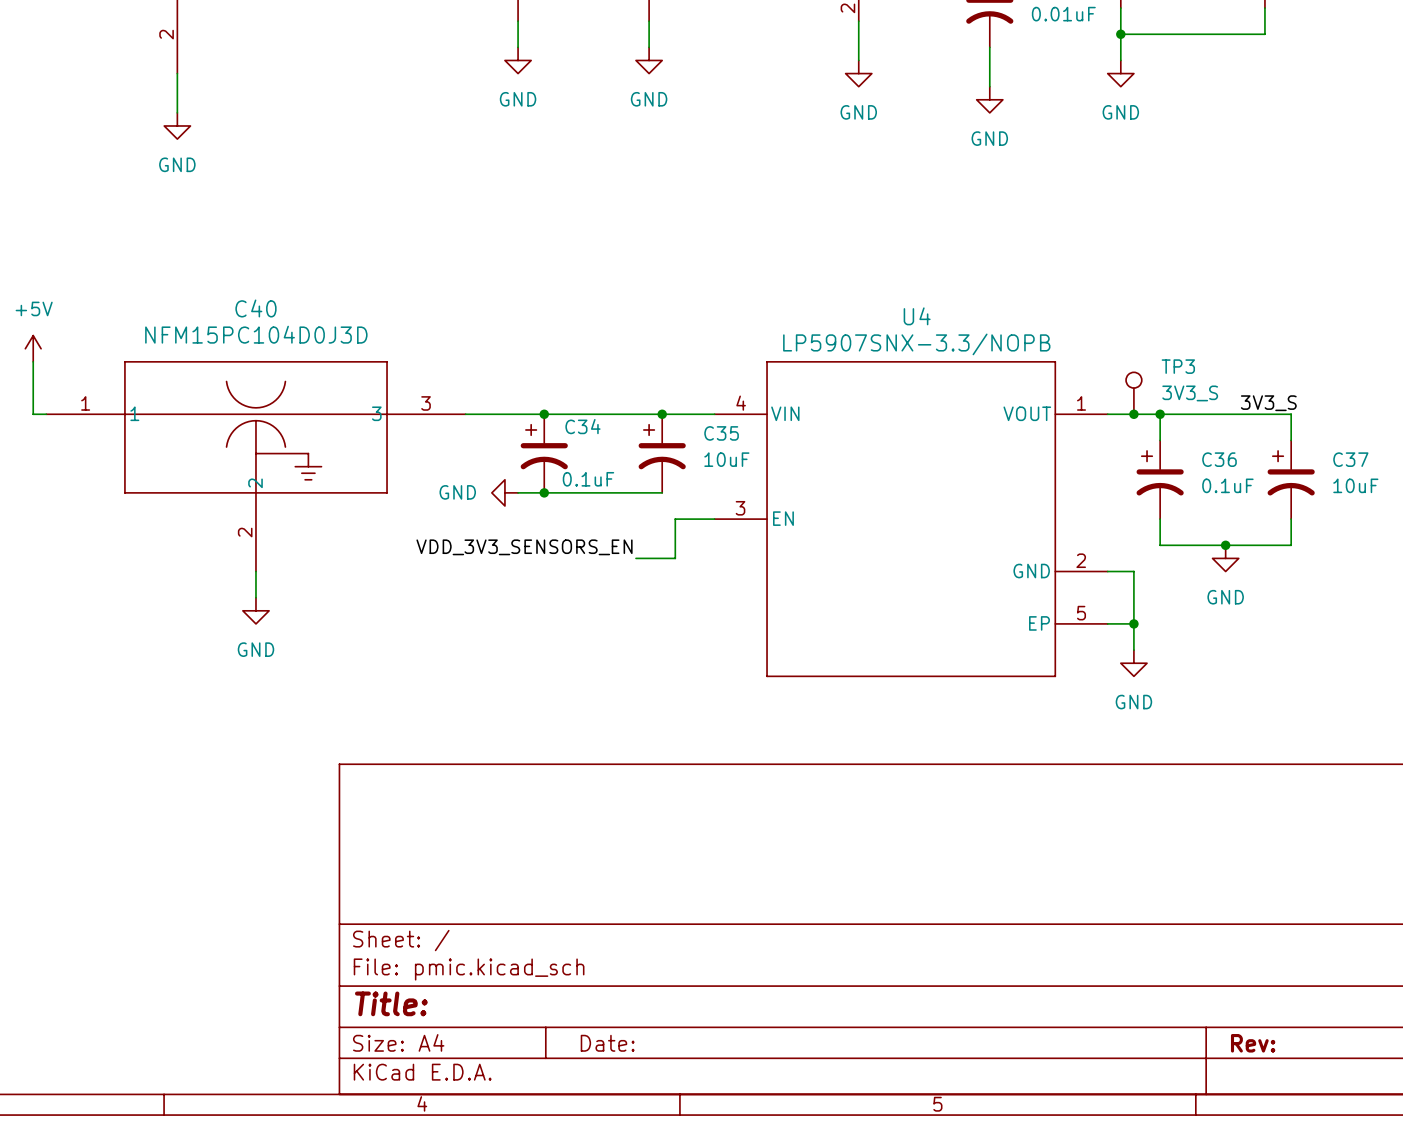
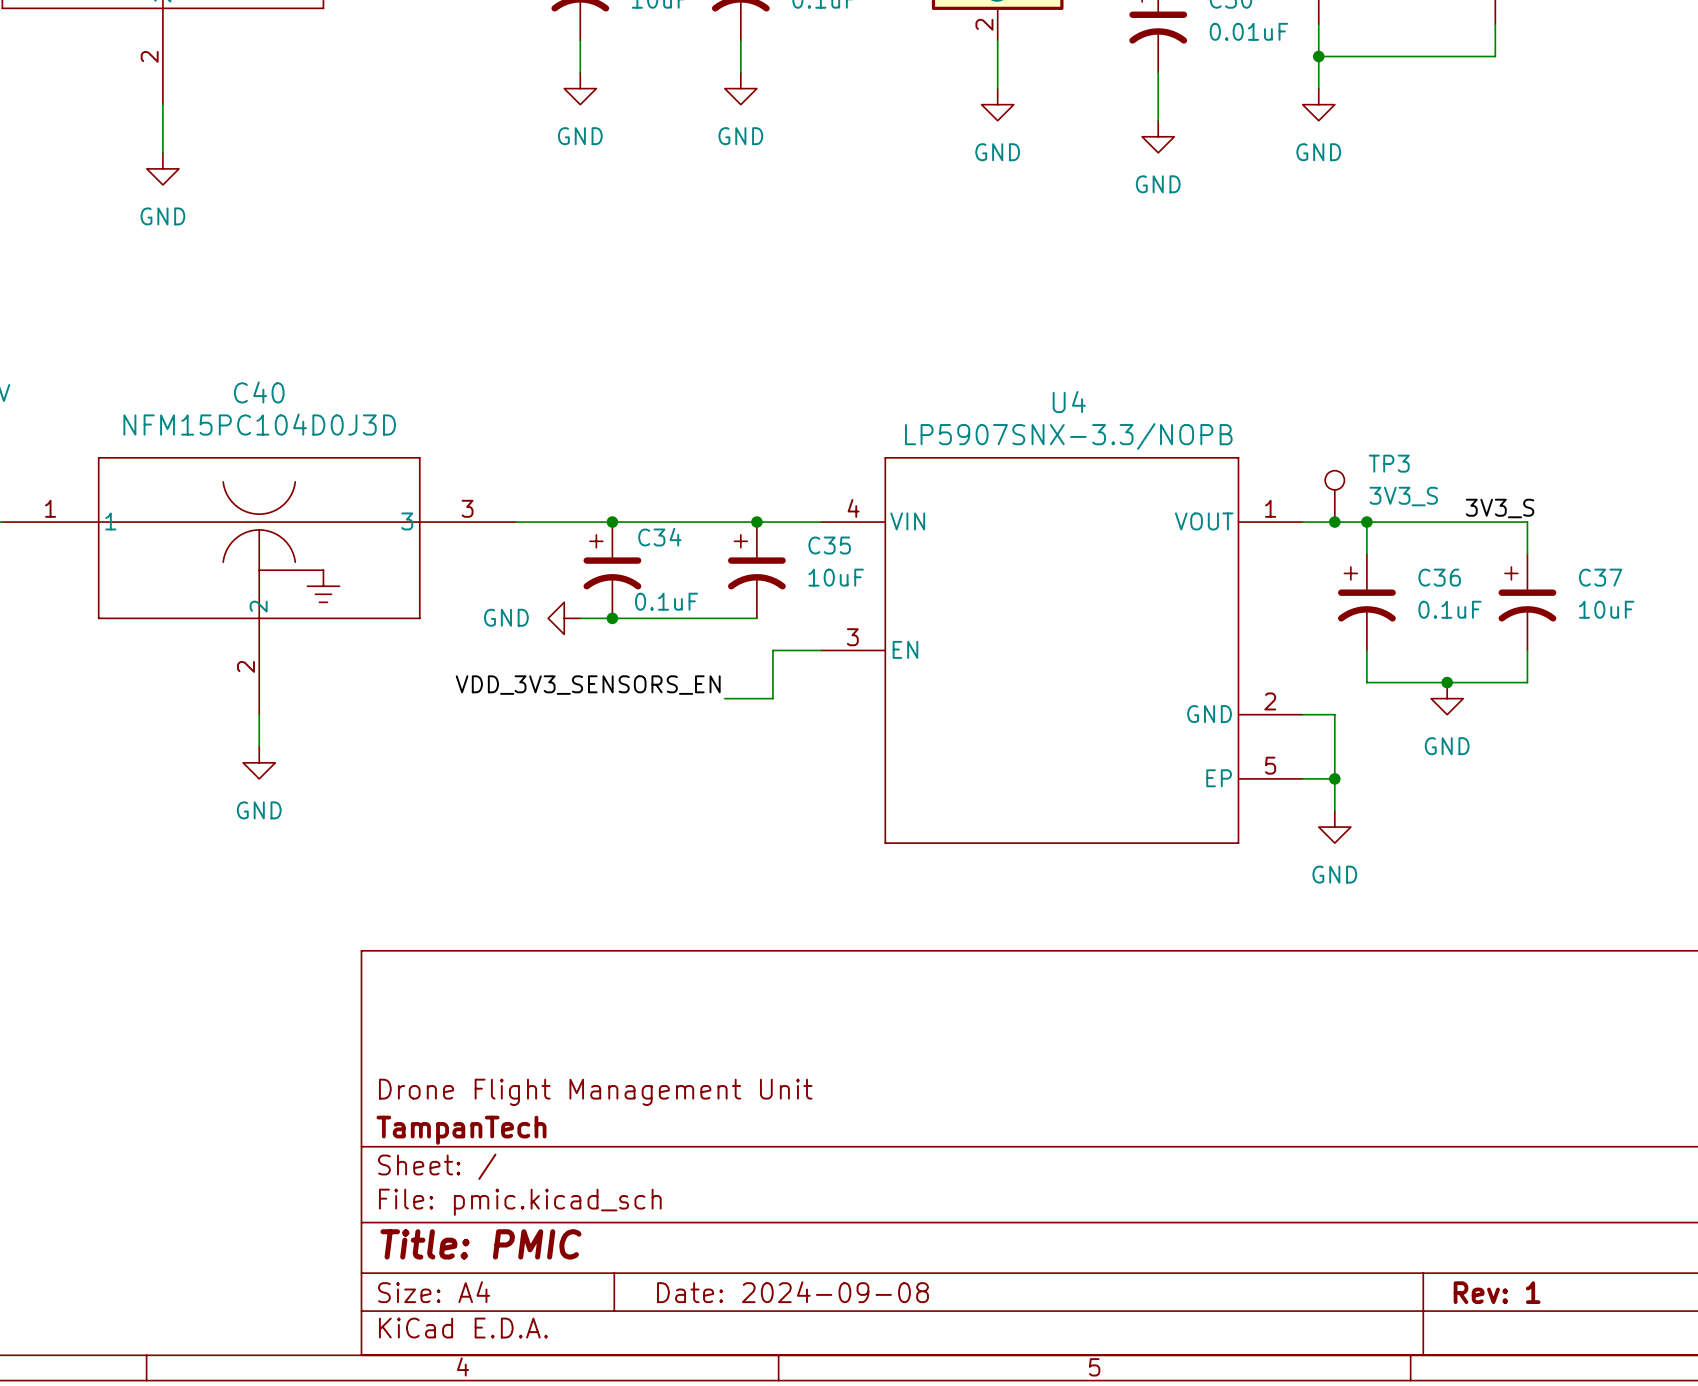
title block: none -> Drone Flight Management Unit (595, 1092)
title block: none -> TampanTech (461, 1130)
title block: Title: (391, 1003) -> Title: PMIC (480, 1244)
title block: Date: (607, 1043) -> Date: 2024-09-08 (792, 1292)
title block: Rev: (1253, 1043) -> Rev: 1 (1497, 1292)

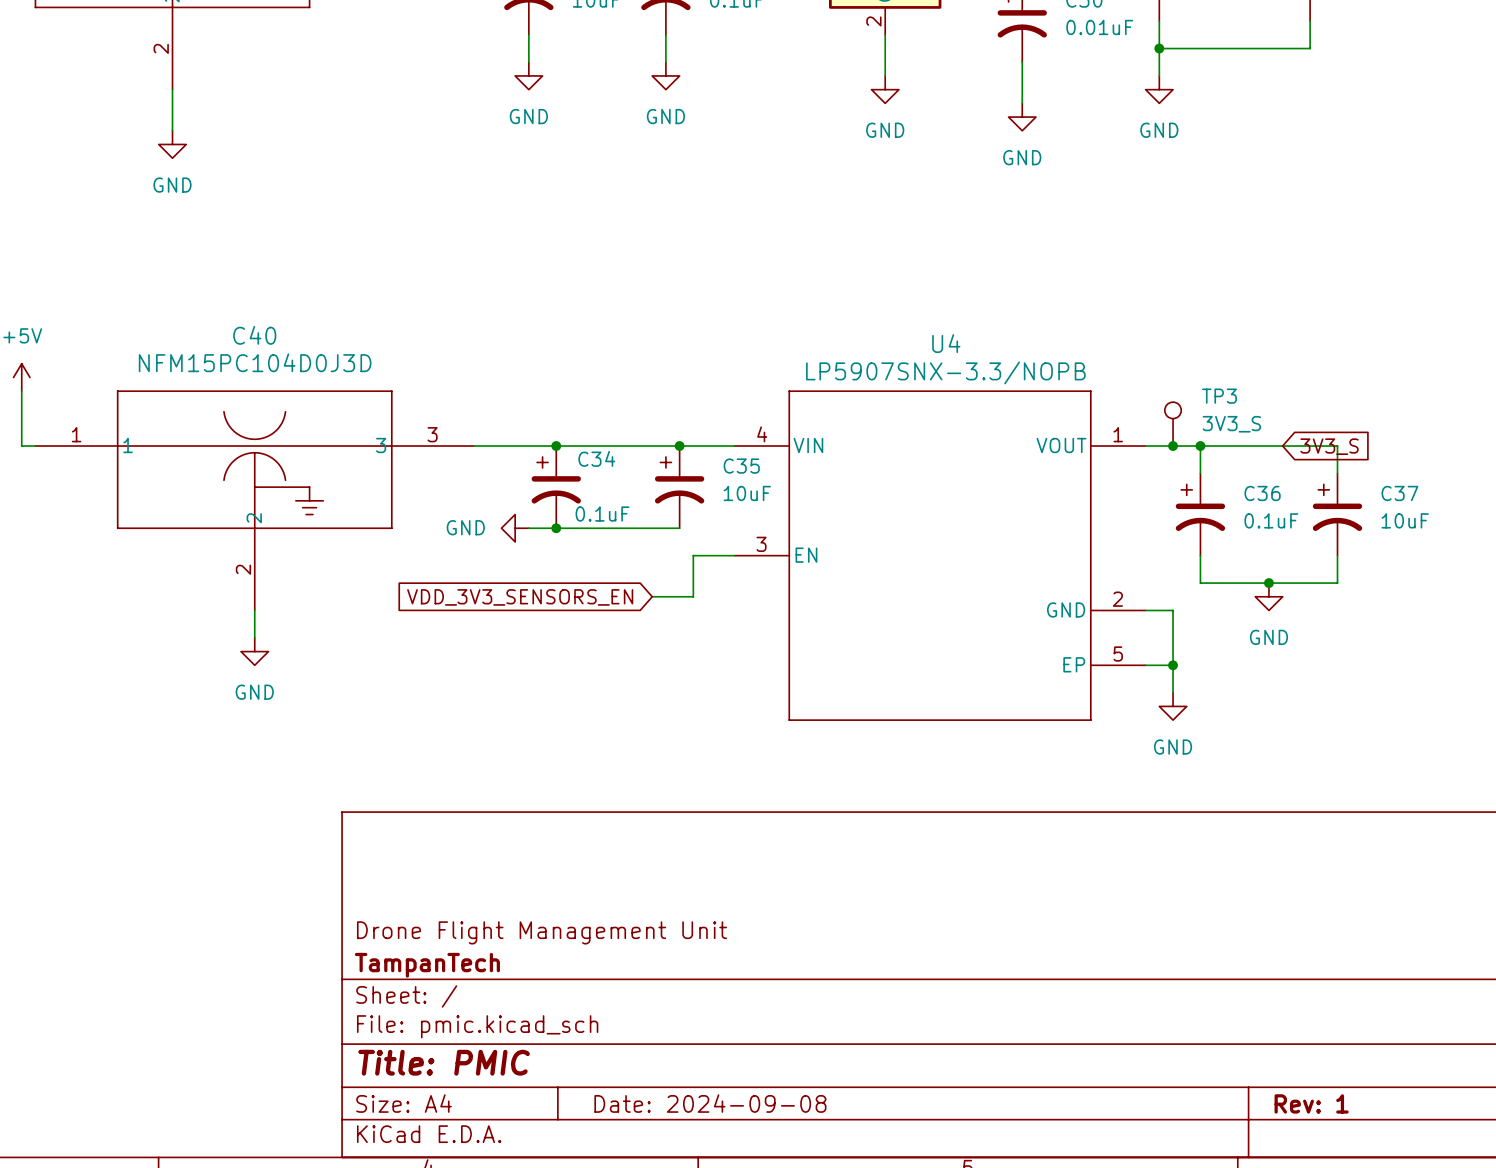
label: 3V3_S (1500, 508) -> none
global label: none -> 3V3_S (1329, 446)
label: VDD_3V3_SENSORS_EN (588, 685) -> none
global label: none -> VDD_3V3_SENSORS_EN (520, 597)

